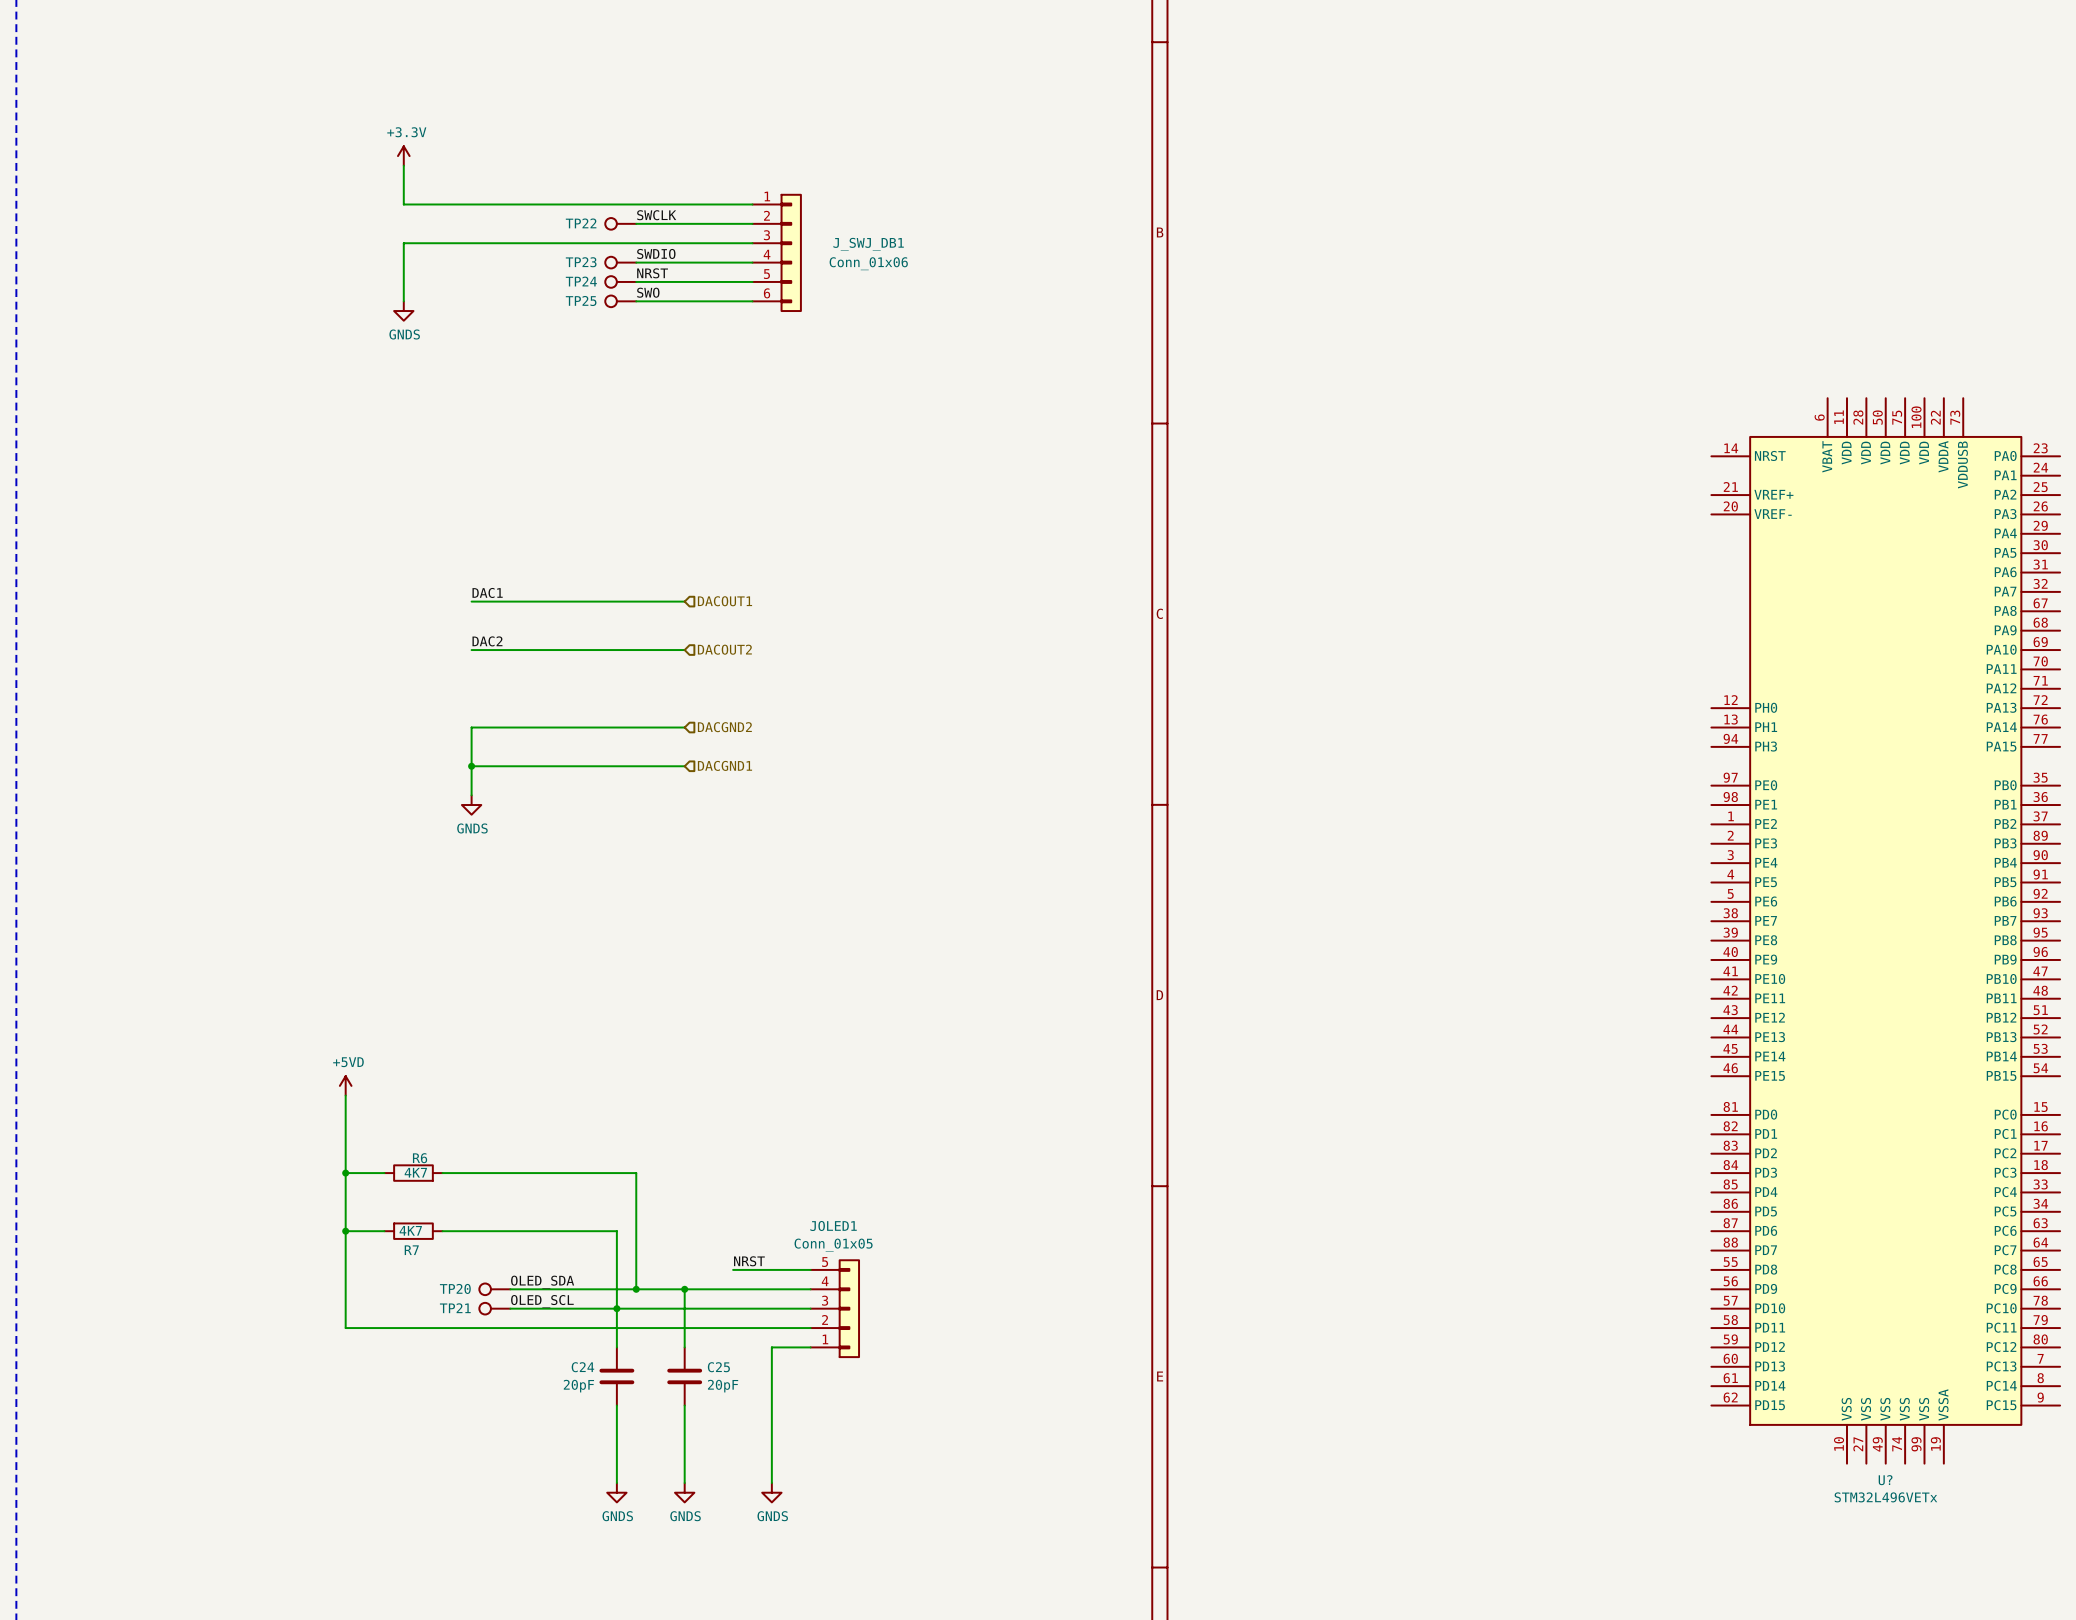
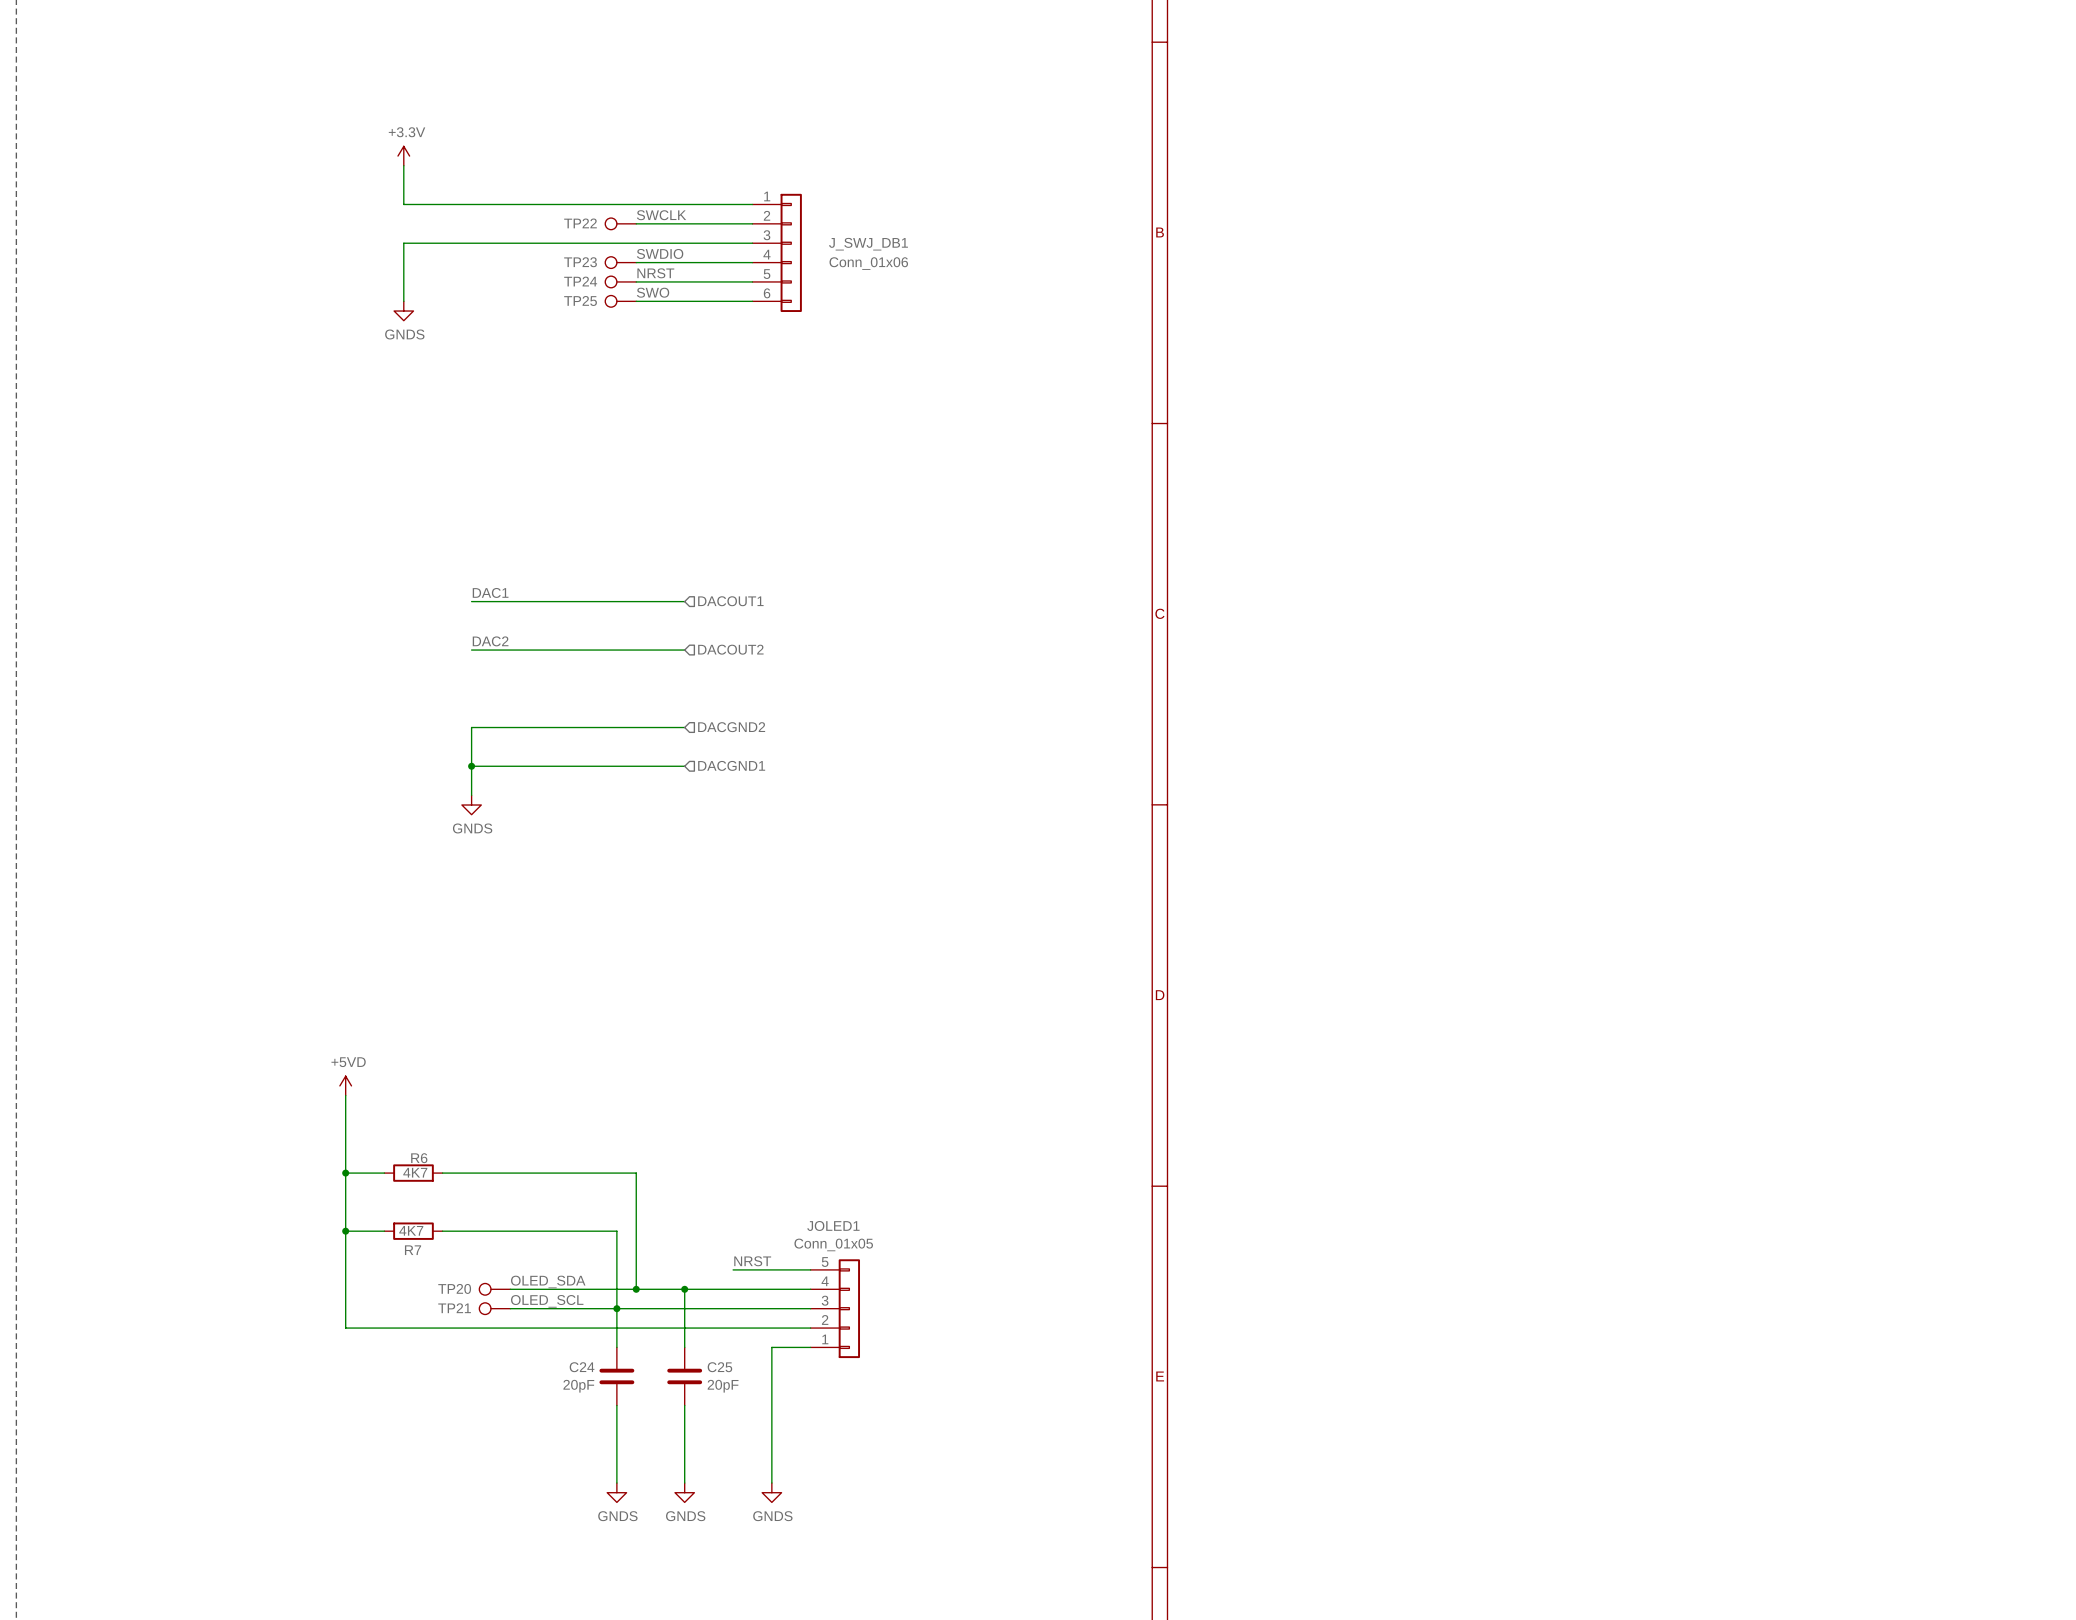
U?: STM32L496VETx (1885, 930) -> none

